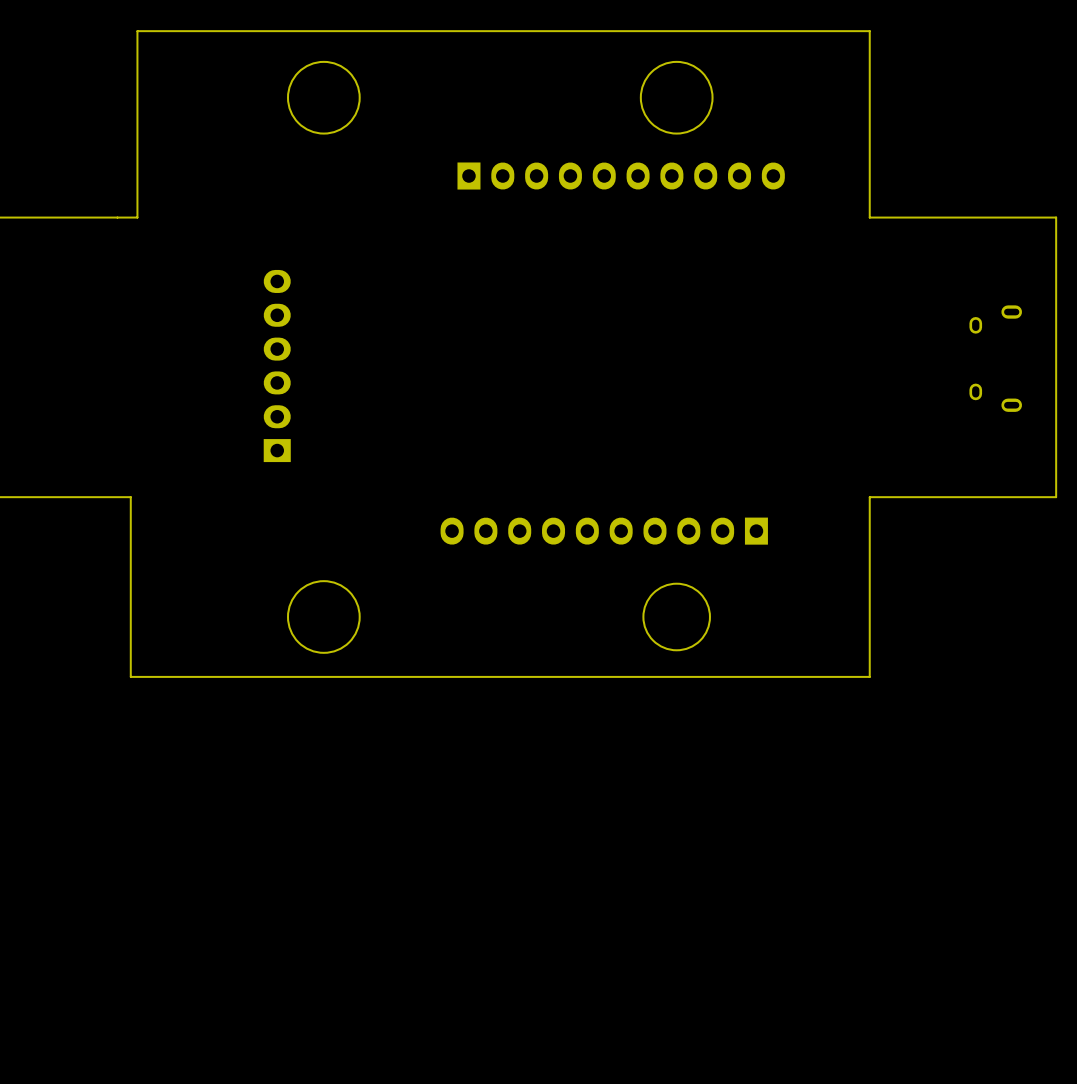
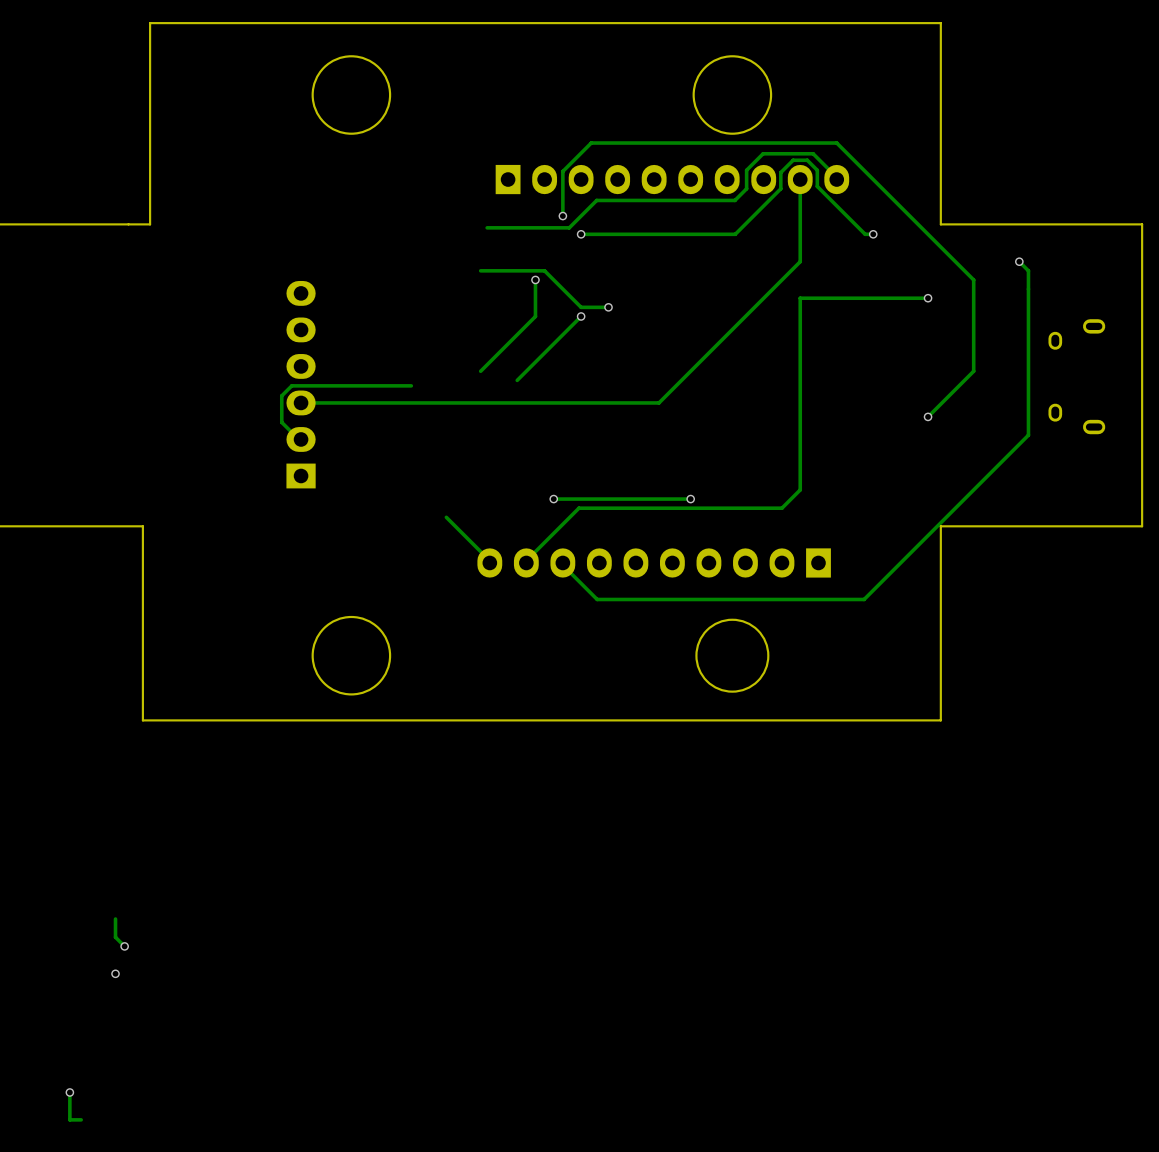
track: none -> (800, 179) (800, 261) (658, 402) (301, 402)
track: none -> (836, 181) (836, 177) (813, 153) (763, 153) (746, 170) (746, 188) (734, 200) (596, 200) (569, 227) (487, 227)
track: none -> (562, 216) (562, 171) (591, 143) (836, 143) (973, 279) (973, 371) (928, 416)
via: none -> (562, 216)
via: none -> (581, 234)
track: none -> (873, 234) (865, 234) (817, 186) (817, 170) (807, 160) (793, 160) (780, 172) (780, 188) (735, 234) (581, 234)
via: none -> (873, 234)
track: none -> (1019, 261) (1028, 270) (1028, 435) (864, 599) (597, 599) (562, 565) (562, 562)
via: none -> (1019, 261)
track: none -> (480, 270) (544, 270) (581, 307) (608, 307)
track: none -> (535, 279) (535, 316) (480, 371)
via: none -> (535, 279)
track: none -> (928, 298) (800, 298) (800, 489) (781, 508) (578, 508) (526, 560) (526, 562)
via: none -> (928, 298)
via: none -> (608, 307)
track: none -> (581, 316) (517, 380)
via: none -> (581, 316)
track: none -> (411, 385) (291, 385) (281, 395) (281, 422) (301, 439)
via: none -> (928, 416)
via: none -> (553, 499)
track: none -> (690, 499) (553, 499)
via: none -> (690, 499)
track: none -> (446, 517) (489, 560) (489, 562)
track: none -> (115, 919) (115, 937) (124, 946)
via: none -> (124, 946)
via: none -> (115, 973)
track: none -> (69, 1092) (69, 1119) (81, 1119)
via: none -> (69, 1092)

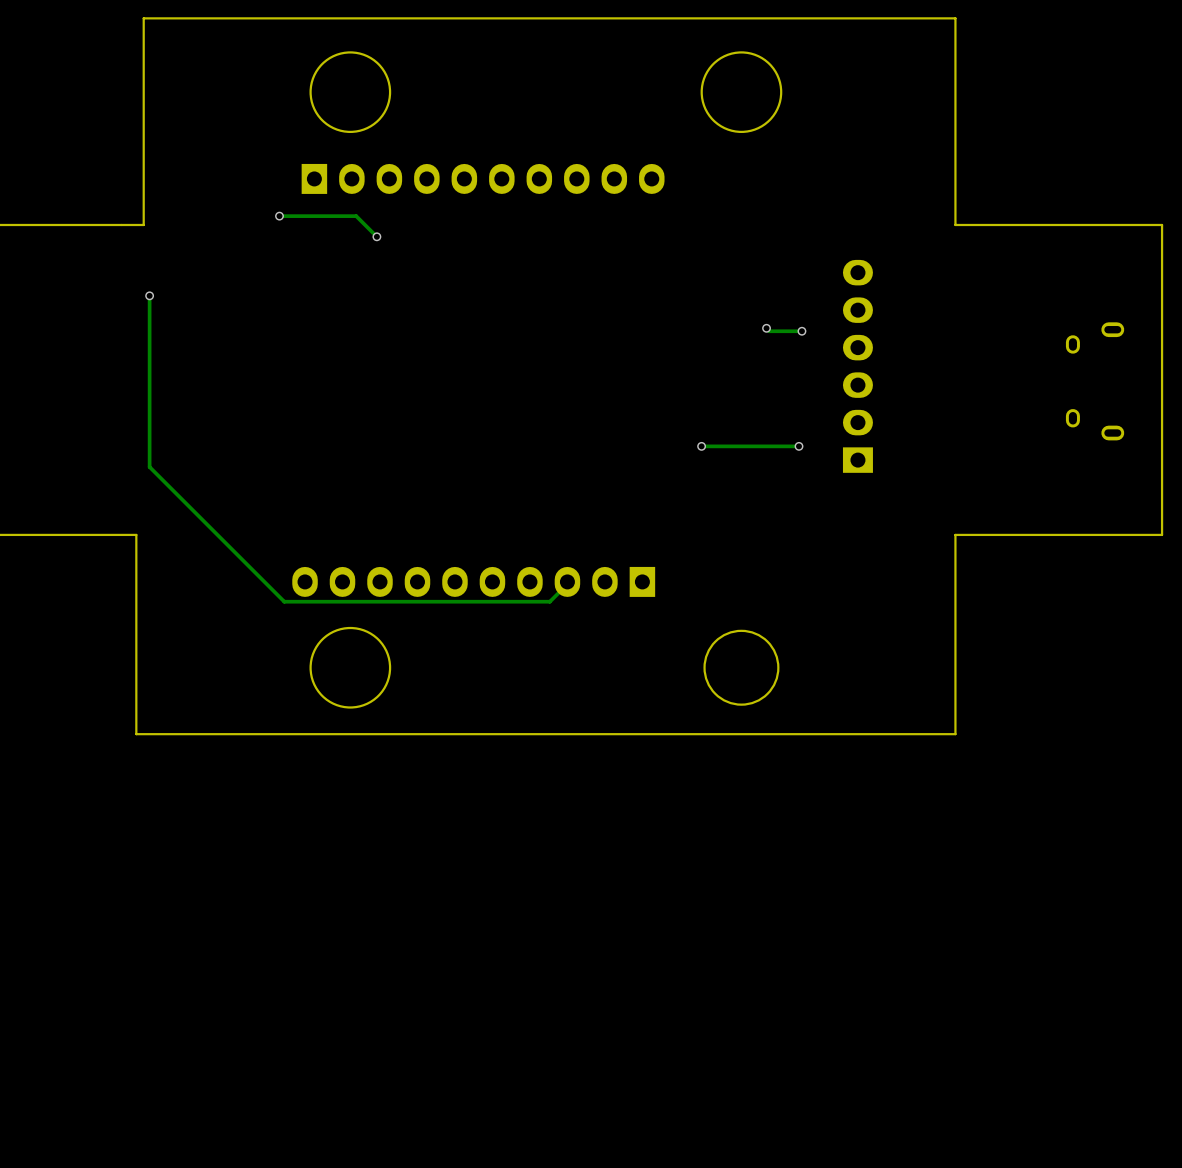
part position: (672, 179) -> (483, 178)
track: (800, 179) (800, 261) (658, 402) (301, 402) -> none
track: (836, 181) (836, 177) (813, 153) (763, 153) (746, 170) (746, 188) (734, 200) (596, 200) (569, 227) (487, 227) -> none
track: none -> (279, 216) (356, 216) (376, 236)
via: none -> (279, 216)
track: (562, 216) (562, 171) (591, 143) (836, 143) (973, 279) (973, 371) (928, 416) -> none
via: (562, 216) -> none
via: (581, 234) -> none
track: (873, 234) (865, 234) (817, 186) (817, 170) (807, 160) (793, 160) (780, 172) (780, 188) (735, 234) (581, 234) -> none
via: (873, 234) -> none
via: none -> (376, 236)
track: (1019, 261) (1028, 270) (1028, 435) (864, 599) (597, 599) (562, 565) (562, 562) -> none
via: (1019, 261) -> none
track: (480, 270) (544, 270) (581, 307) (608, 307) -> none
track: (535, 279) (535, 316) (480, 371) -> none
via: (535, 279) -> none
track: none -> (149, 295) (149, 467) (284, 601) (549, 601) (567, 581)
via: none -> (149, 295)
track: (928, 298) (800, 298) (800, 489) (781, 508) (578, 508) (526, 560) (526, 562) -> none
via: (928, 298) -> none
via: (608, 307) -> none
track: (581, 316) (517, 380) -> none
via: (581, 316) -> none
track: none -> (766, 328) (769, 331) (801, 331)
via: none -> (766, 328)
via: none -> (801, 331)
part: none -> (857, 366)
part: (301, 384) -> none
track: (411, 385) (291, 385) (281, 395) (281, 422) (301, 439) -> none
via: (928, 416) -> none
via: none -> (701, 446)
track: none -> (799, 446) (701, 446)
via: none -> (799, 446)
via: (553, 499) -> none
track: (690, 499) (553, 499) -> none
via: (690, 499) -> none
track: (446, 517) (489, 560) (489, 562) -> none
part position: (654, 562) -> (473, 581)
track: (115, 919) (115, 937) (124, 946) -> none
via: (124, 946) -> none
via: (115, 973) -> none
track: (69, 1092) (69, 1119) (81, 1119) -> none
via: (69, 1092) -> none

